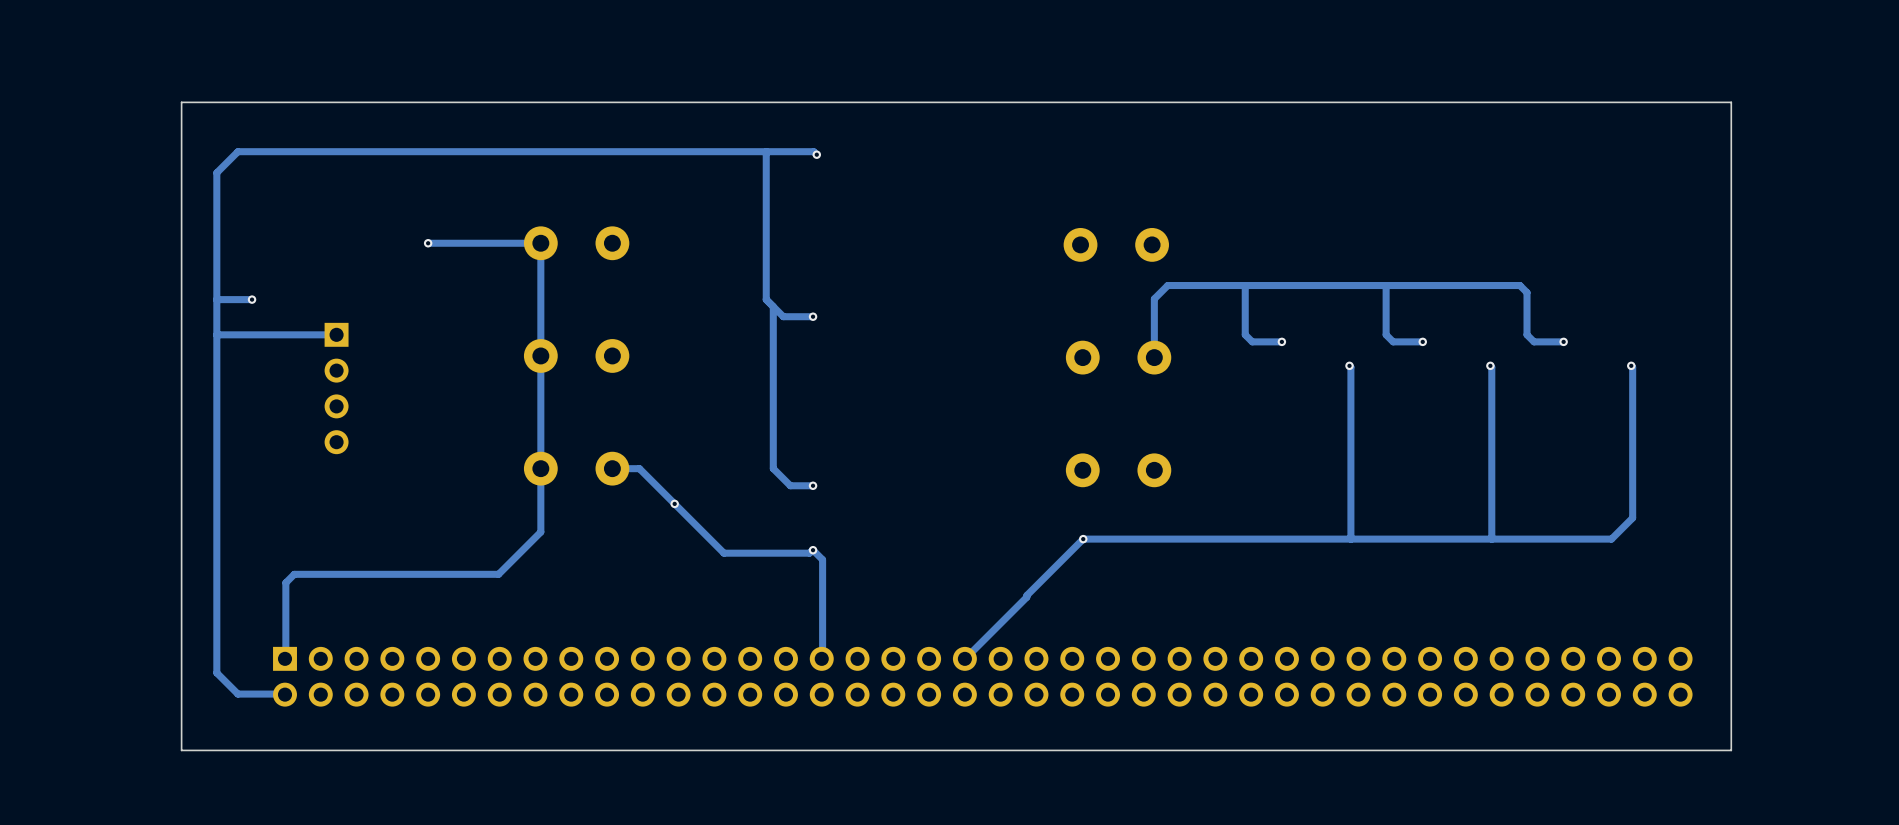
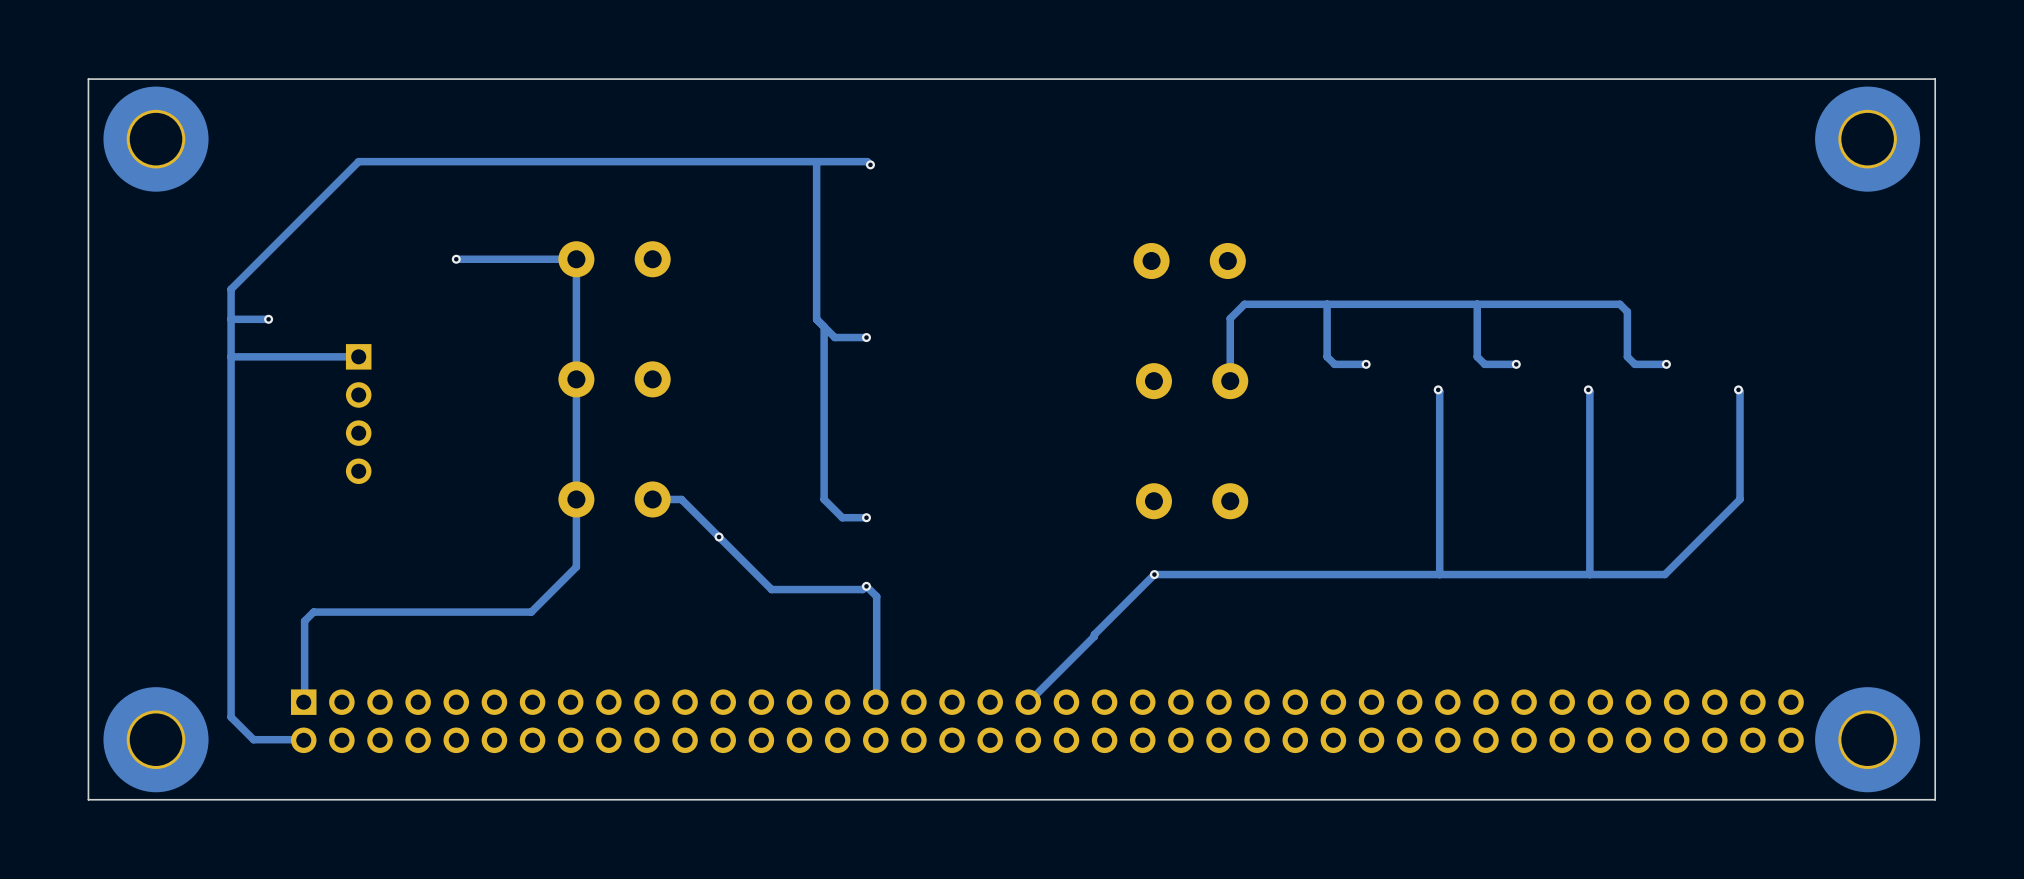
part: none -> (156, 139)
part: none -> (1867, 139)
track: (336, 151) (237, 151) (216, 172) (216, 271) -> (358, 161) (231, 289)
track: (1632, 468) (1632, 517) (1611, 539) (1562, 539) -> (1740, 499) (1664, 574)
part: none -> (156, 739)
part: none -> (1867, 739)
board edge: (1731, 750) (1731, 102) (181, 102) (181, 750) -> (1845, 799) (1935, 799) (1935, 79) (88, 79) (88, 799) (193, 799)

